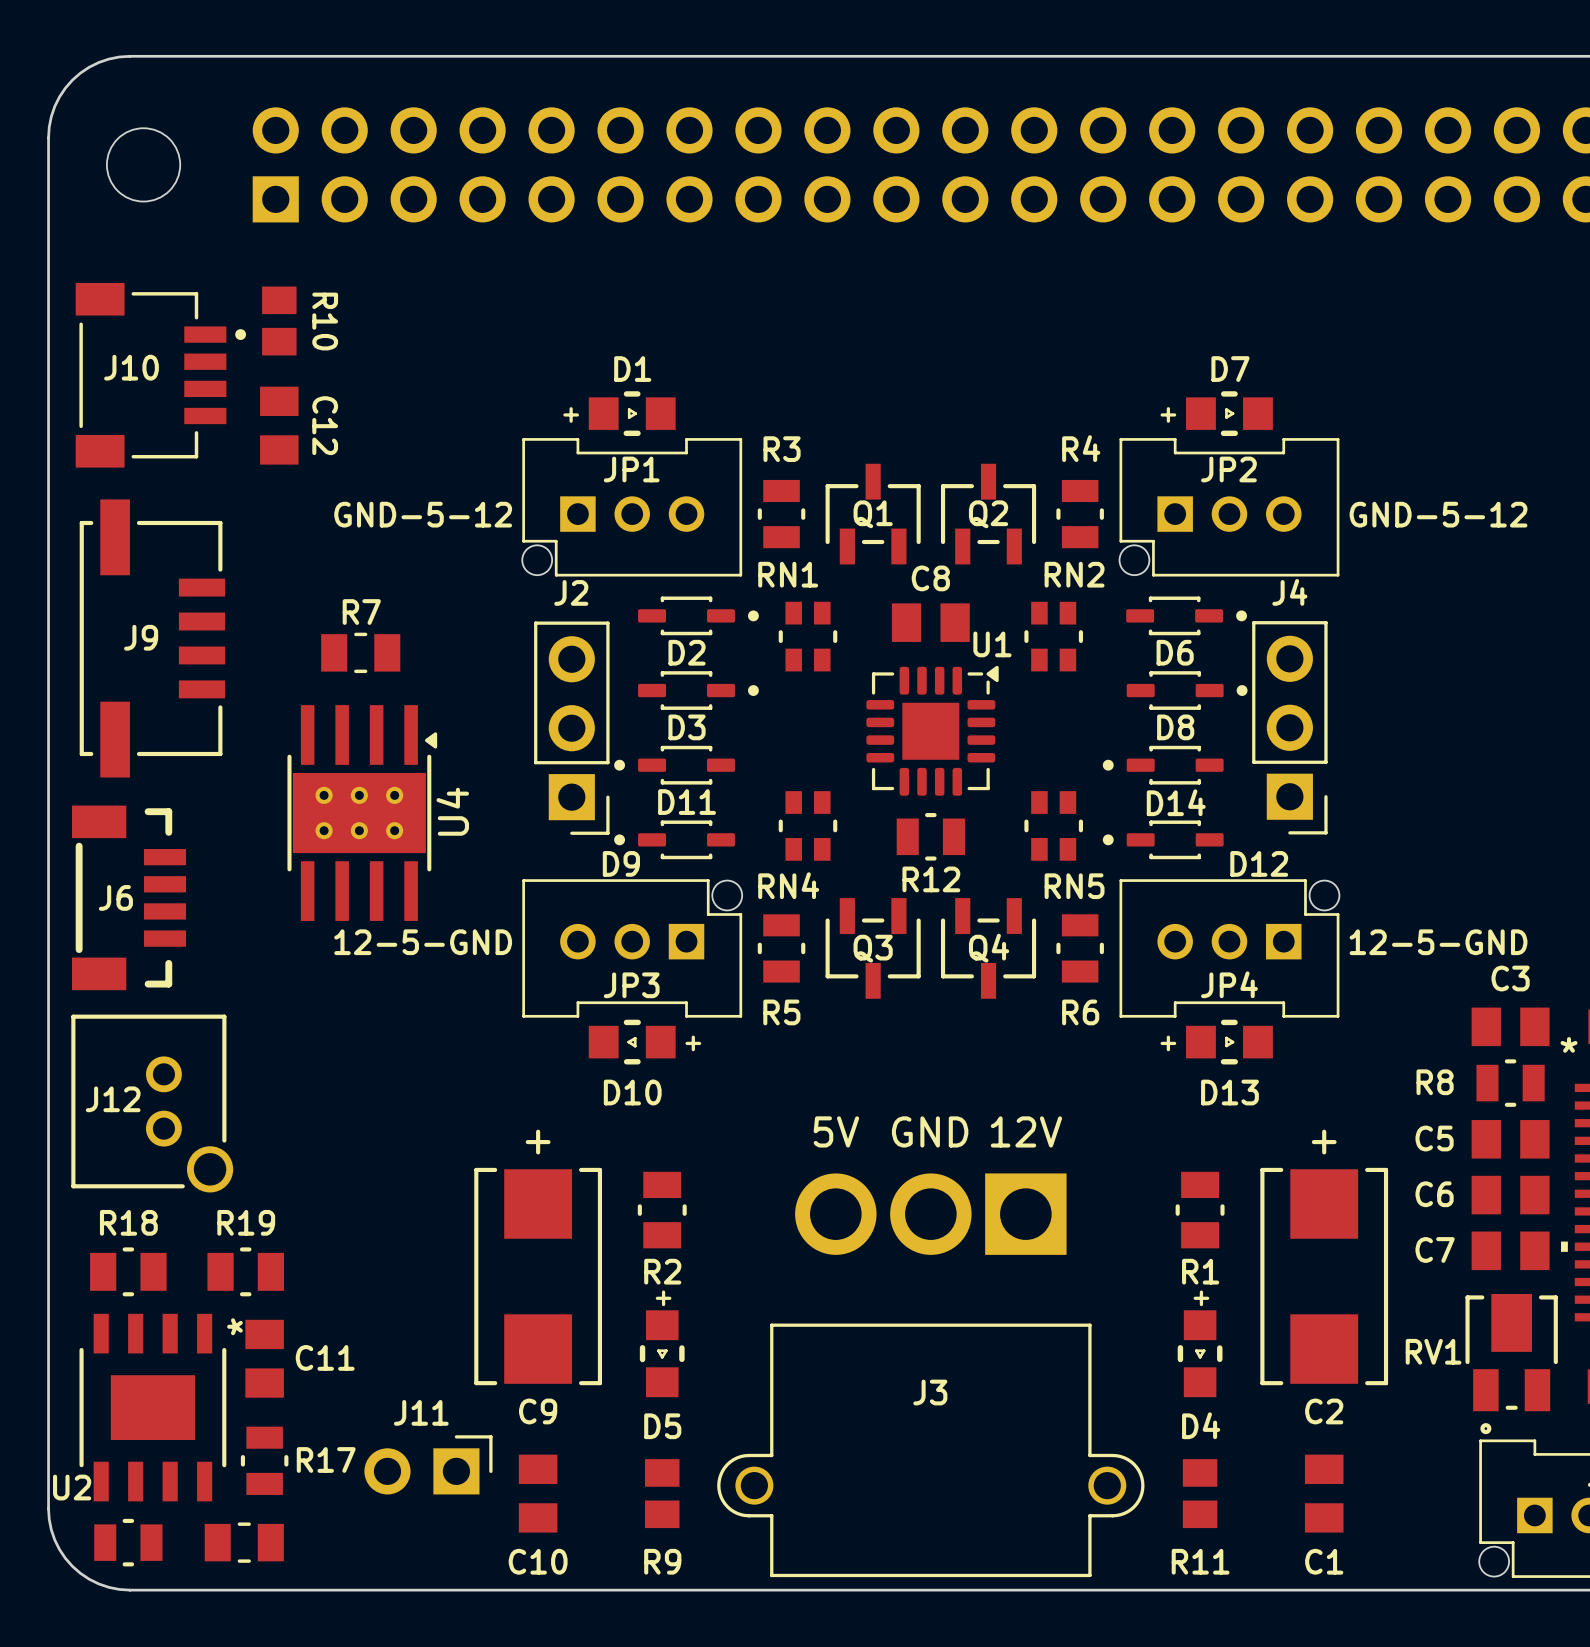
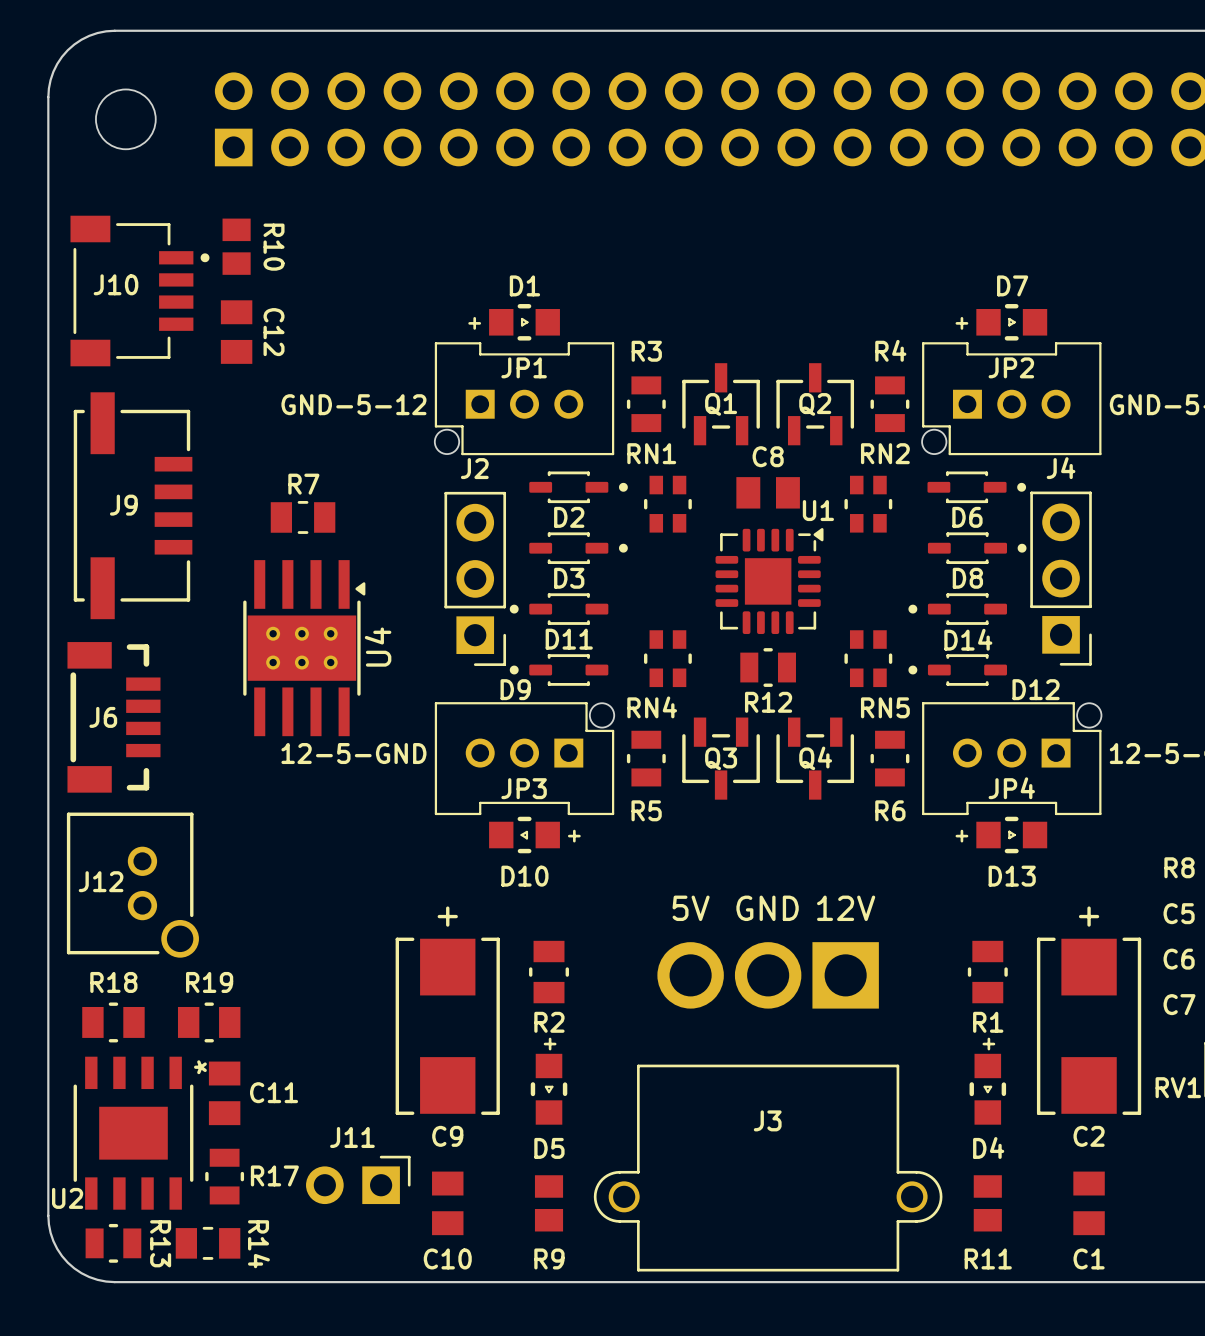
R13 name: none -> R13 (160, 1243)
R14 name: none -> R14 (258, 1244)

